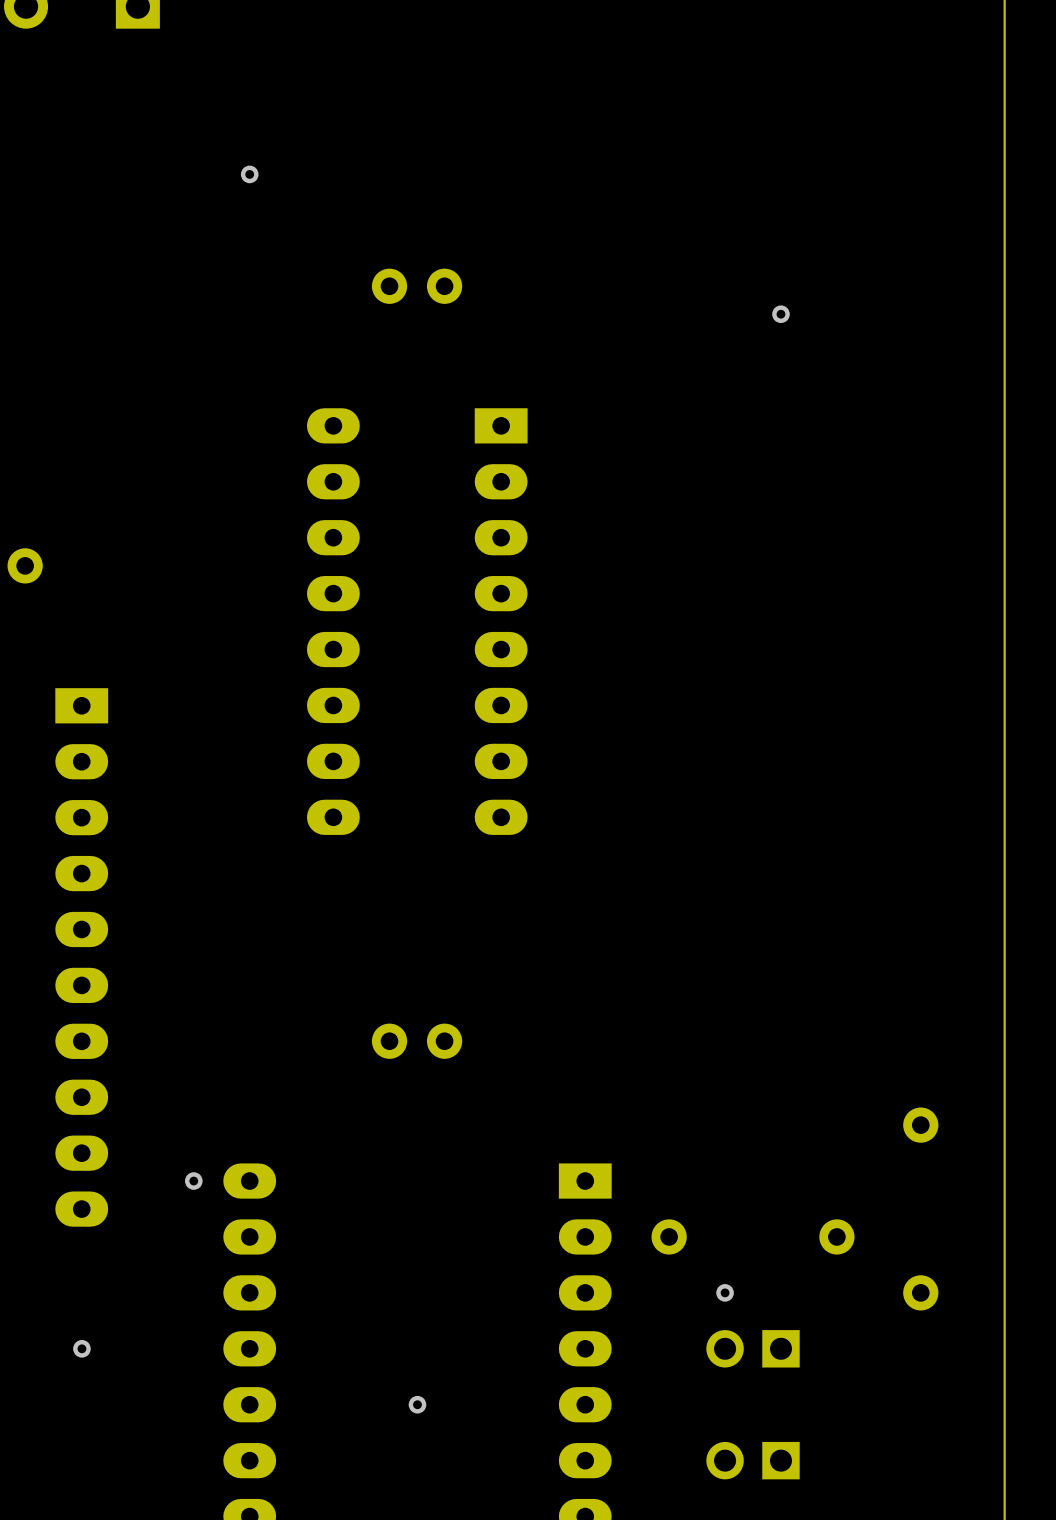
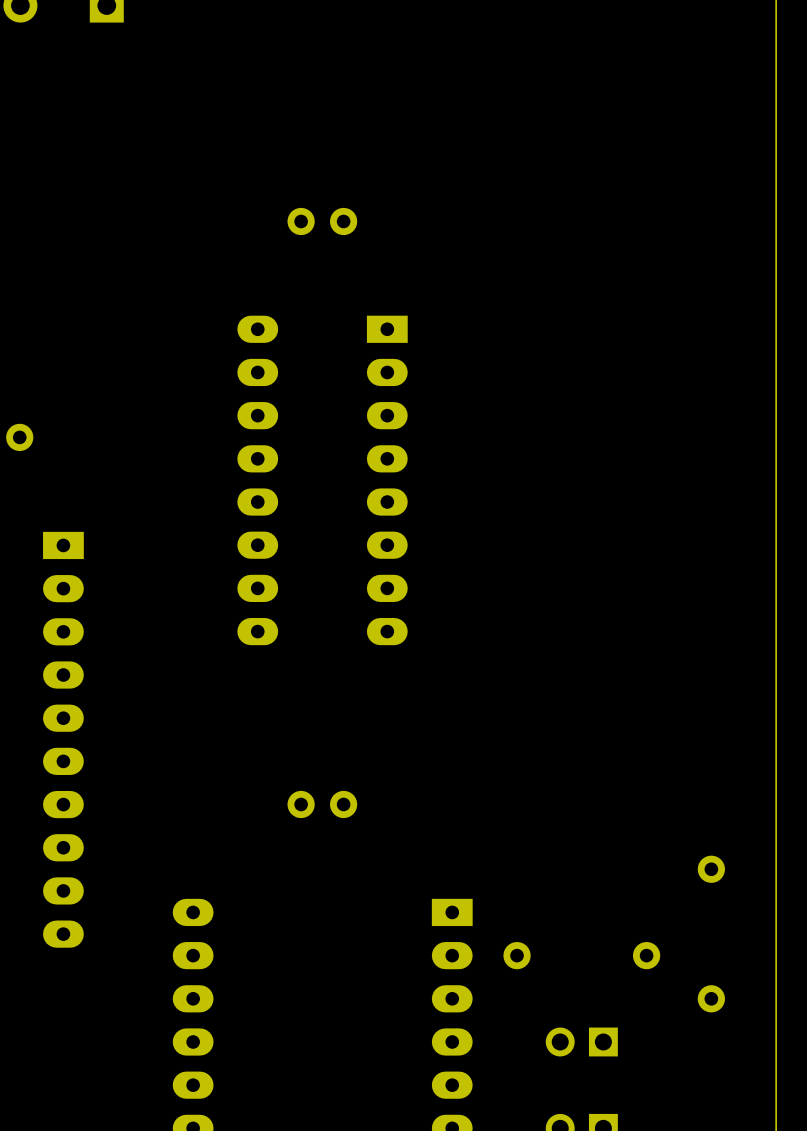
via: (249, 174) -> none
via: (780, 314) -> none
via: (193, 1181) -> none
via: (725, 1292) -> none
via: (81, 1348) -> none
via: (417, 1404) -> none

